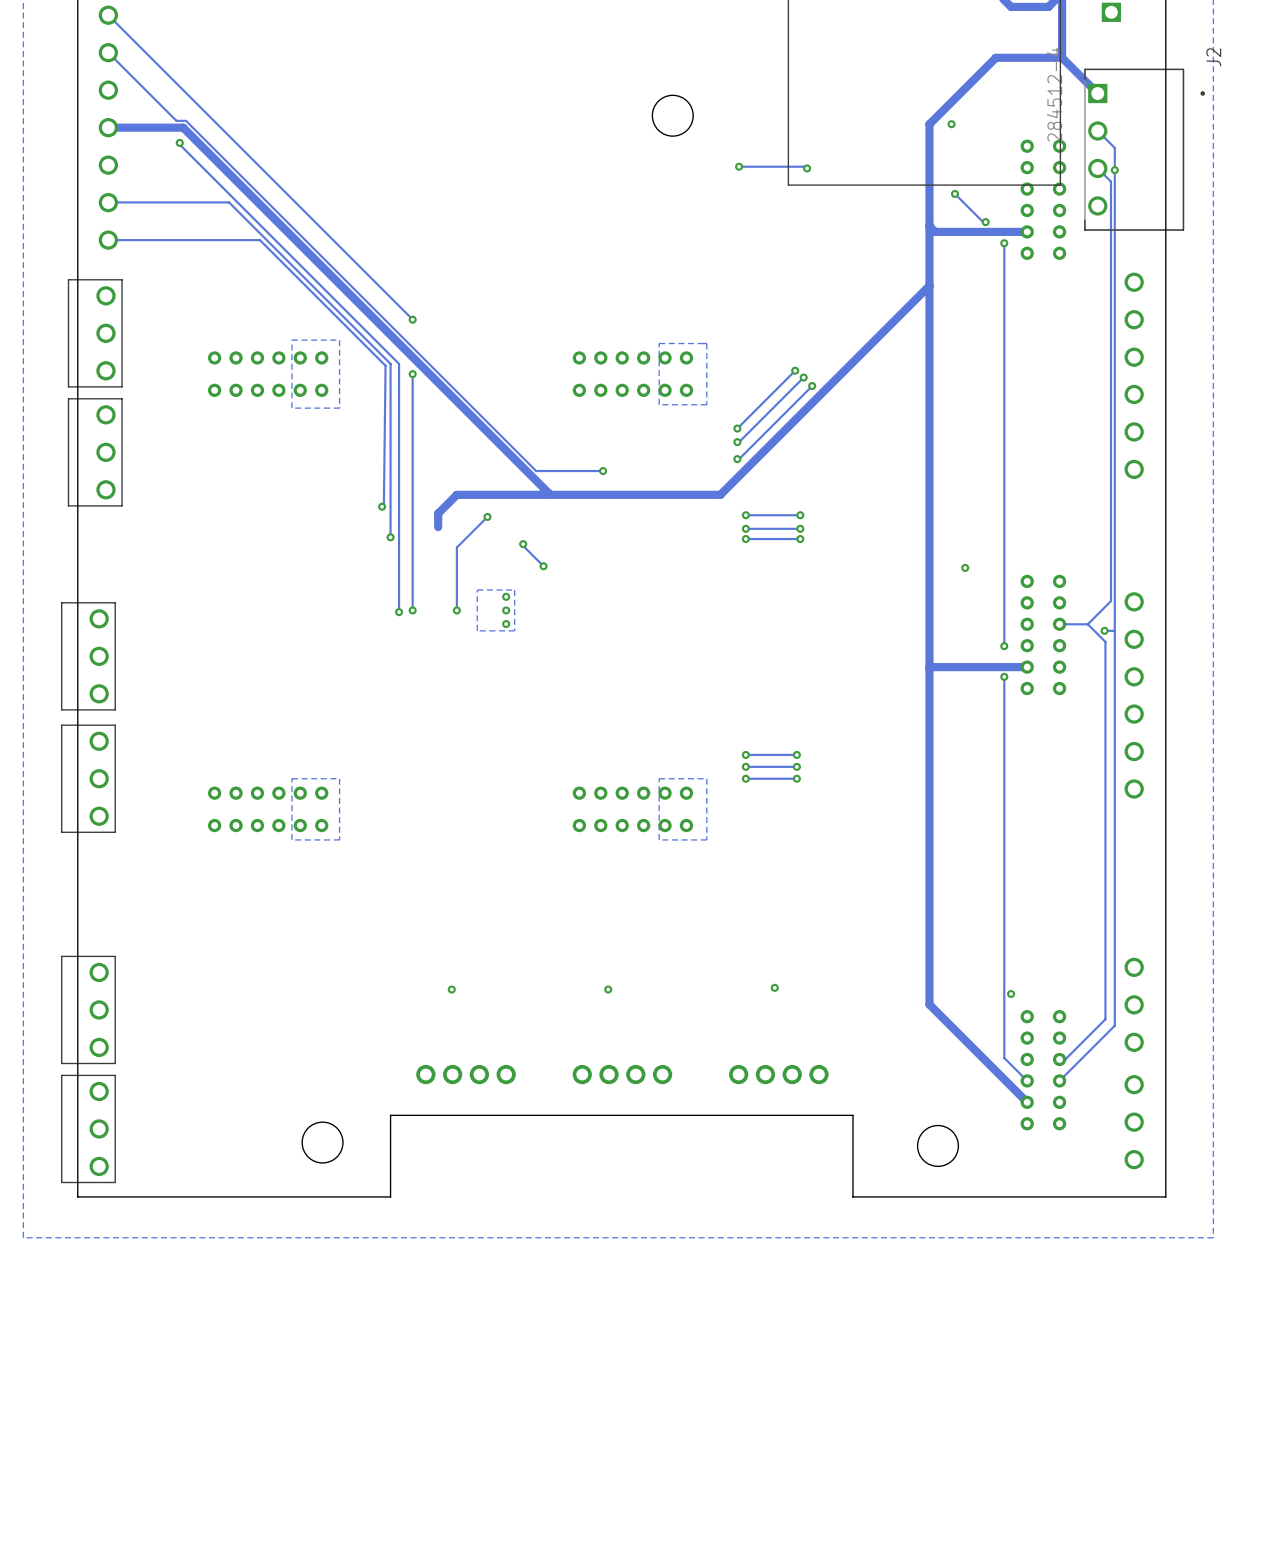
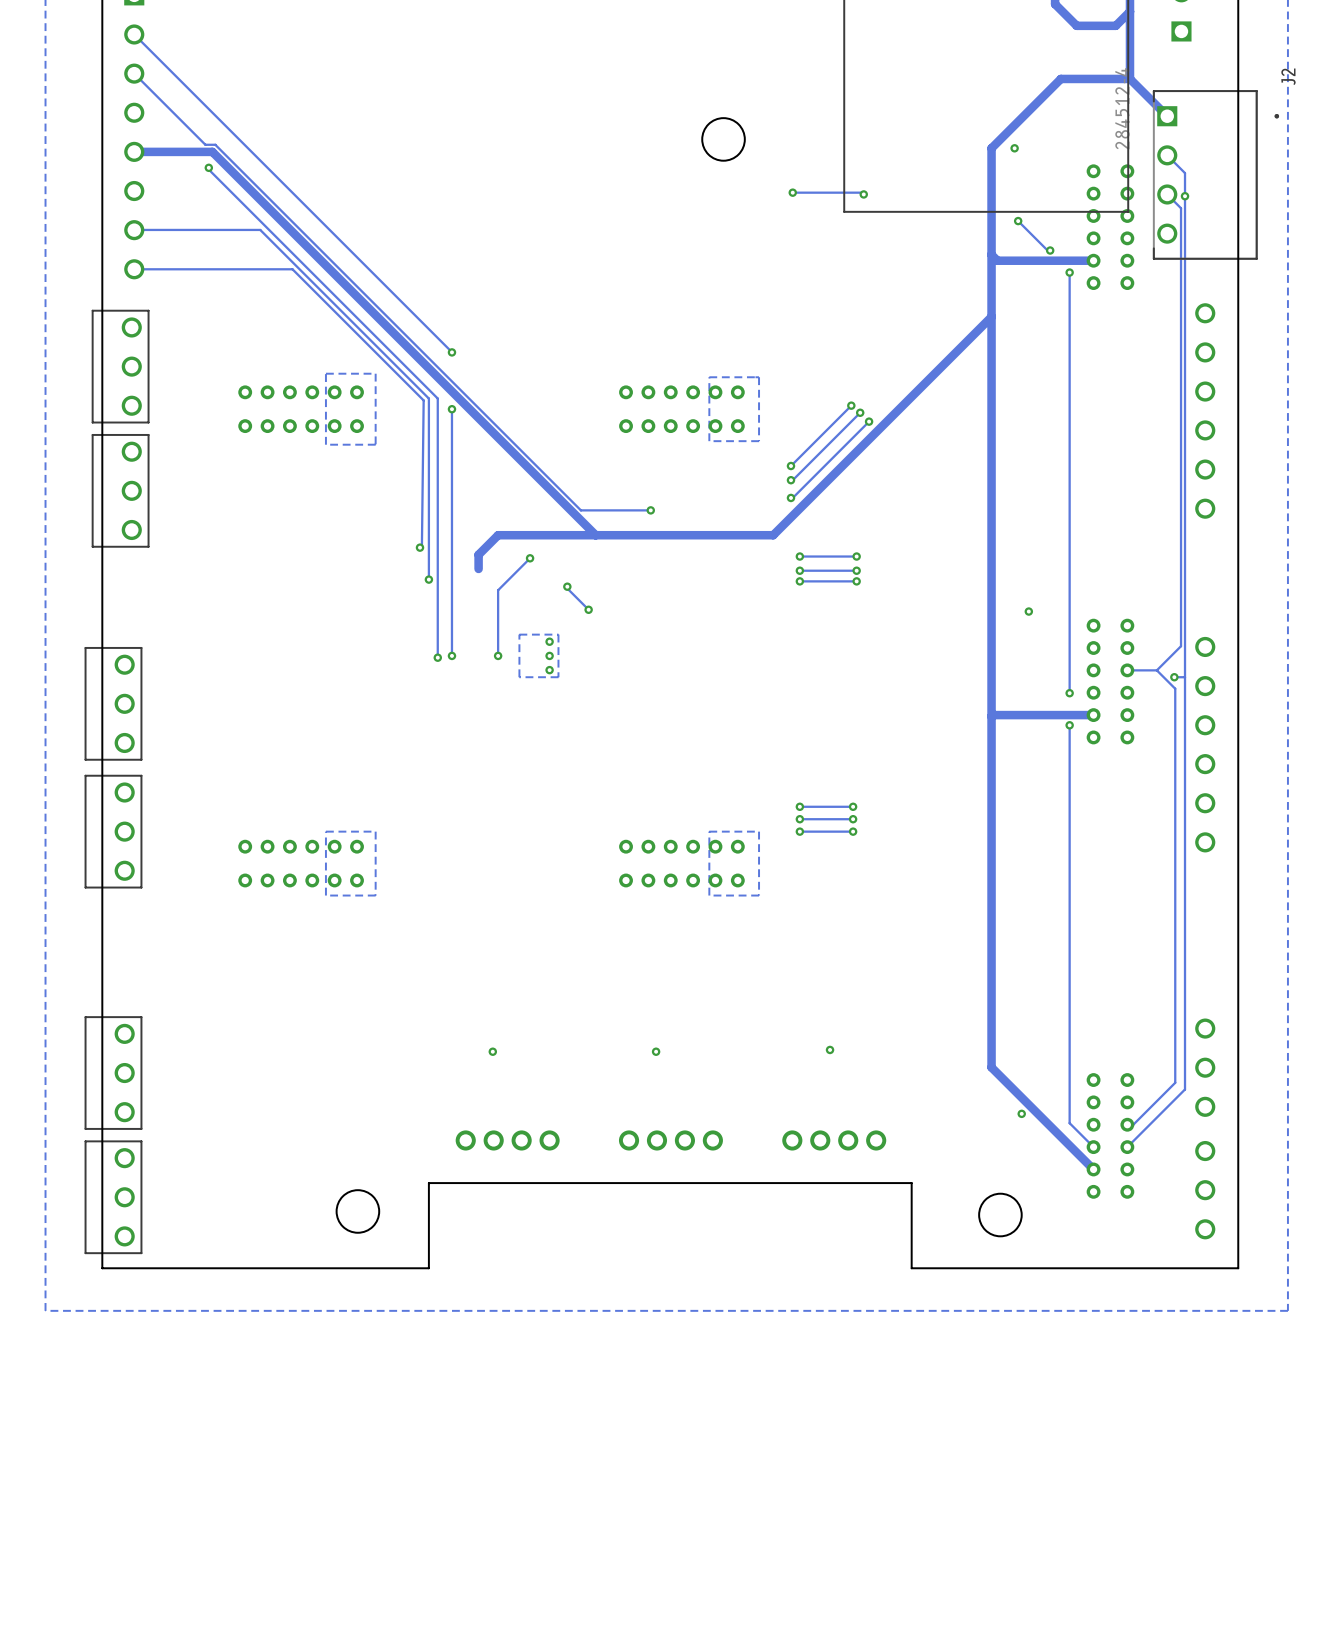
via: (1011, 993) -> none
via: none -> (1021, 1113)

